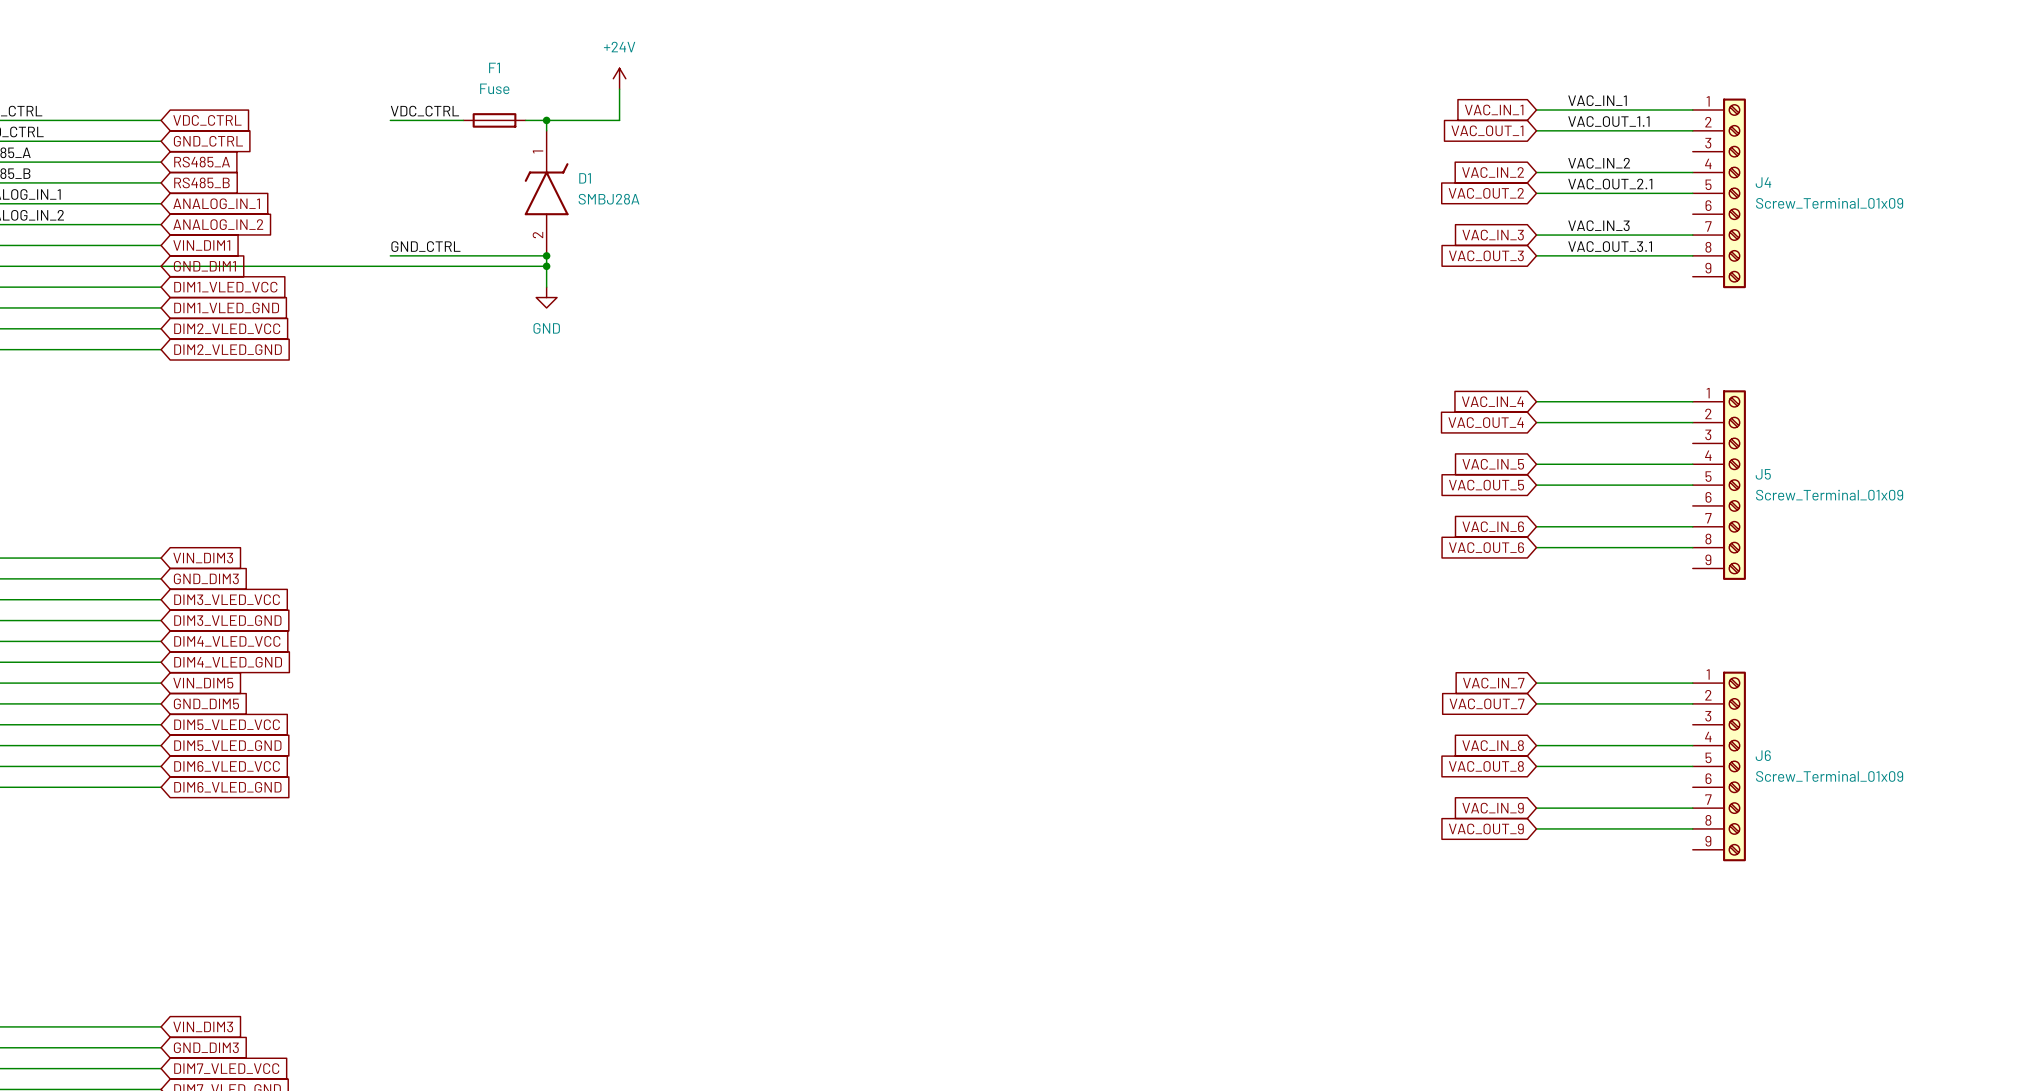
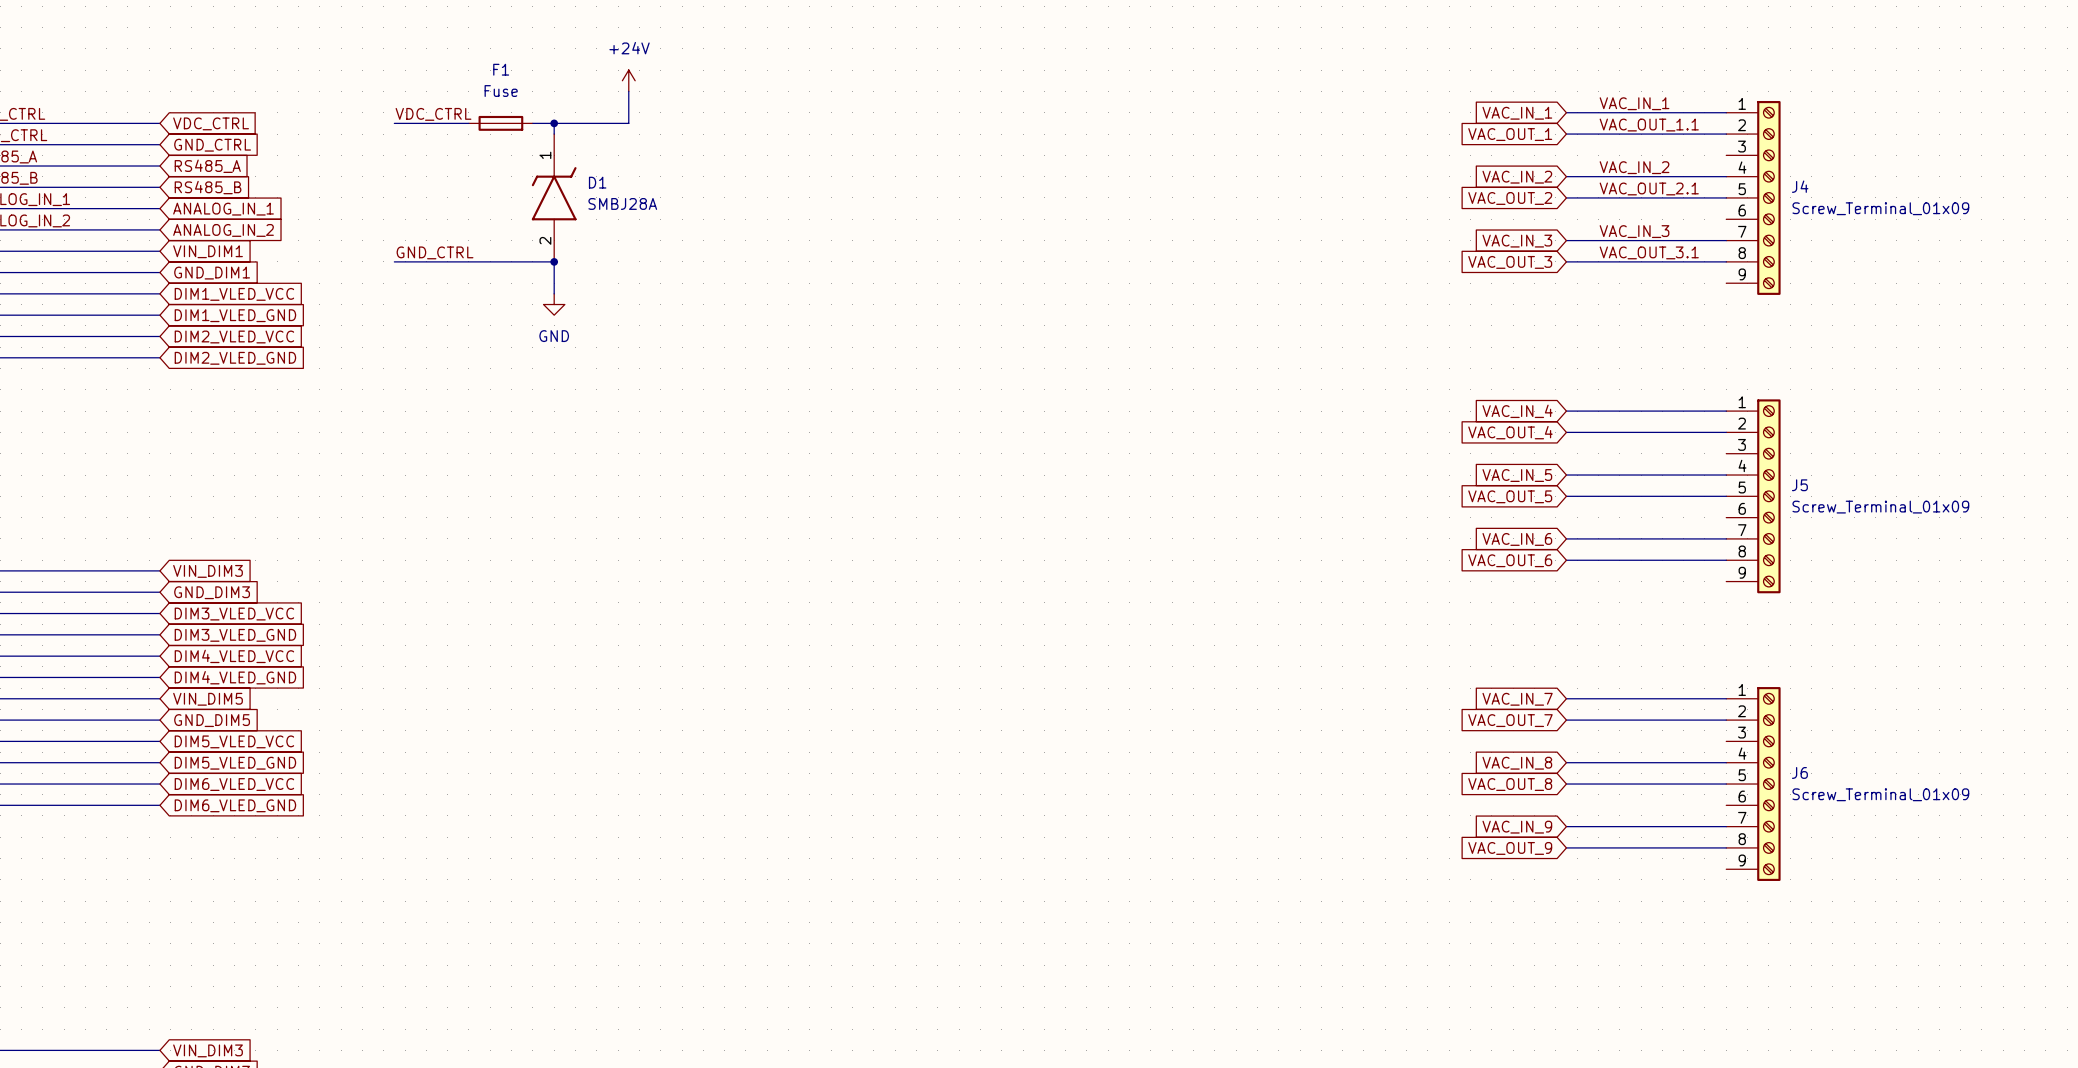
wire: (161, 266) (546, 266) -> none
junction: (546, 266) -> none

